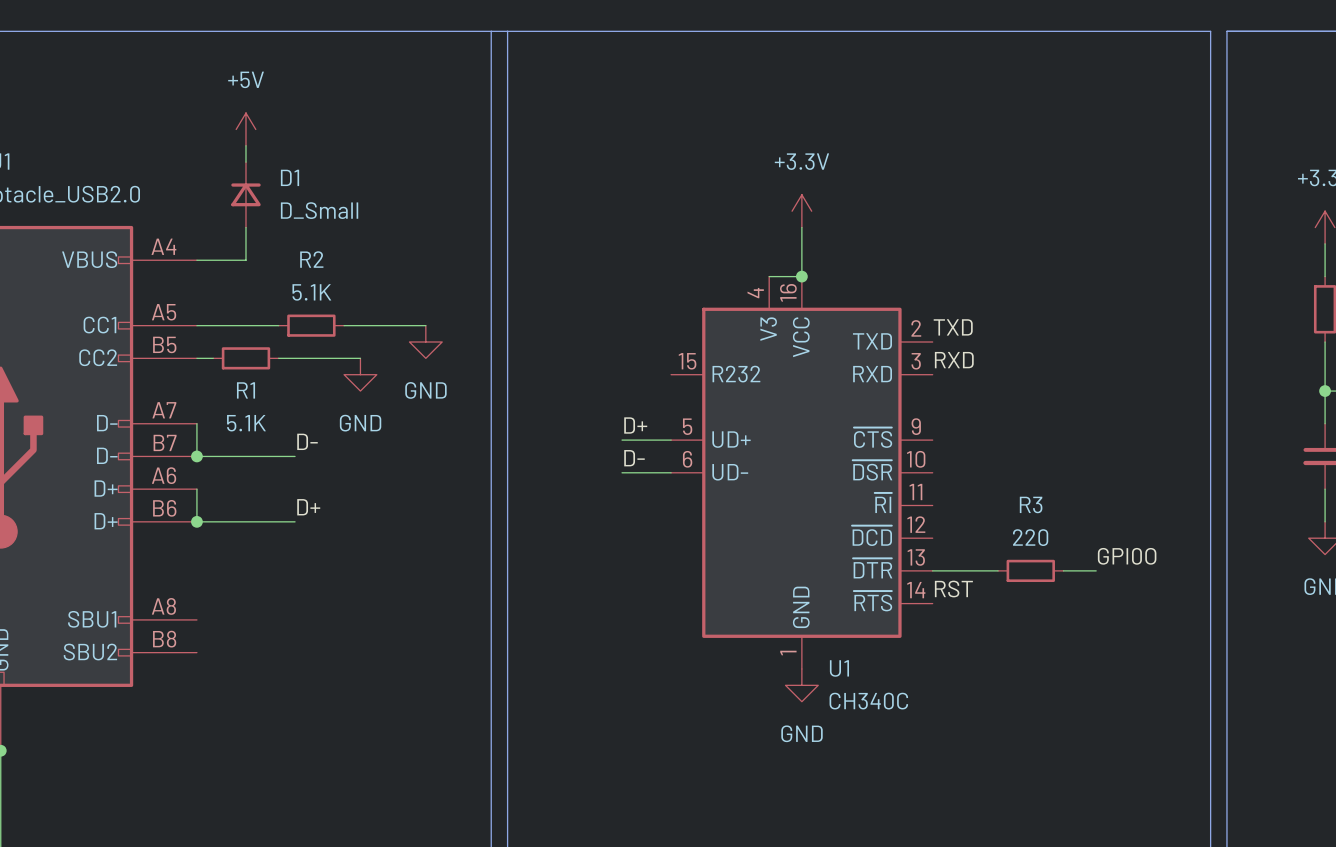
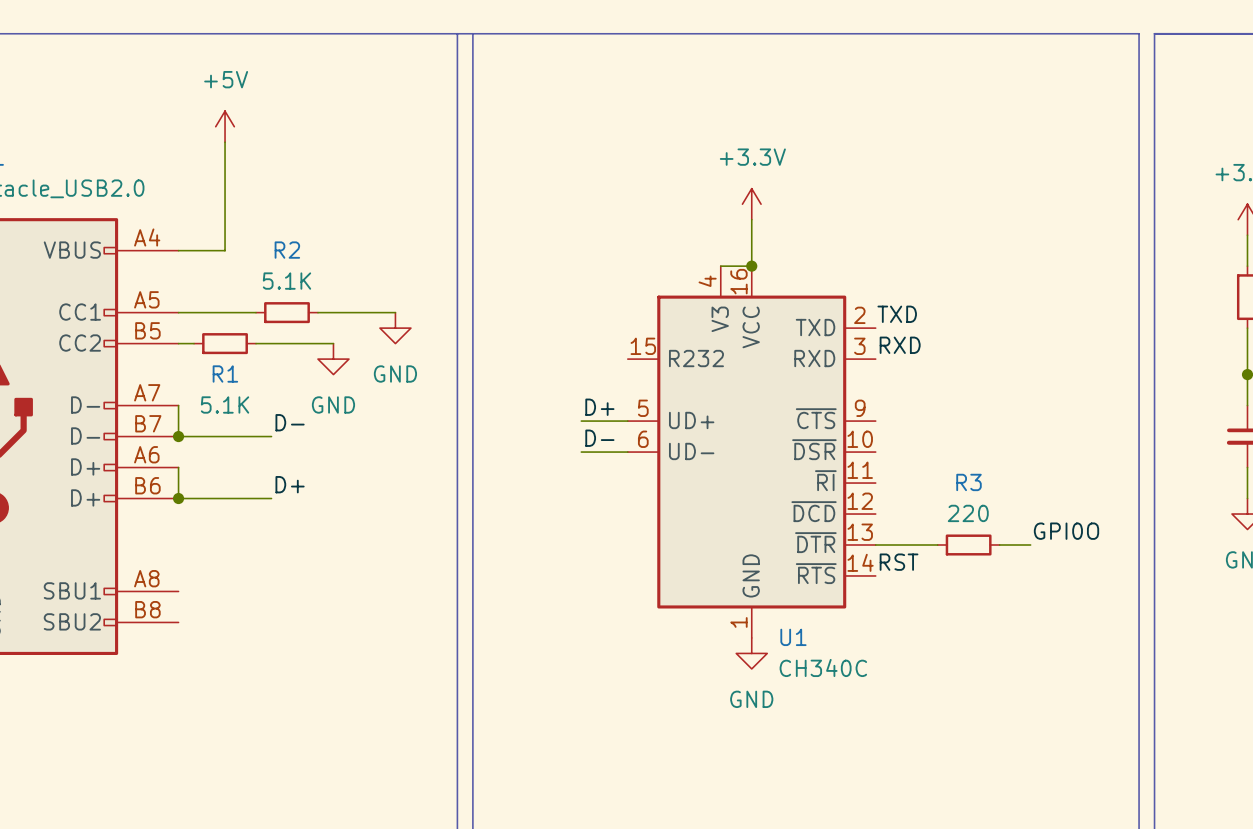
D1: D_Small (245, 194) -> none

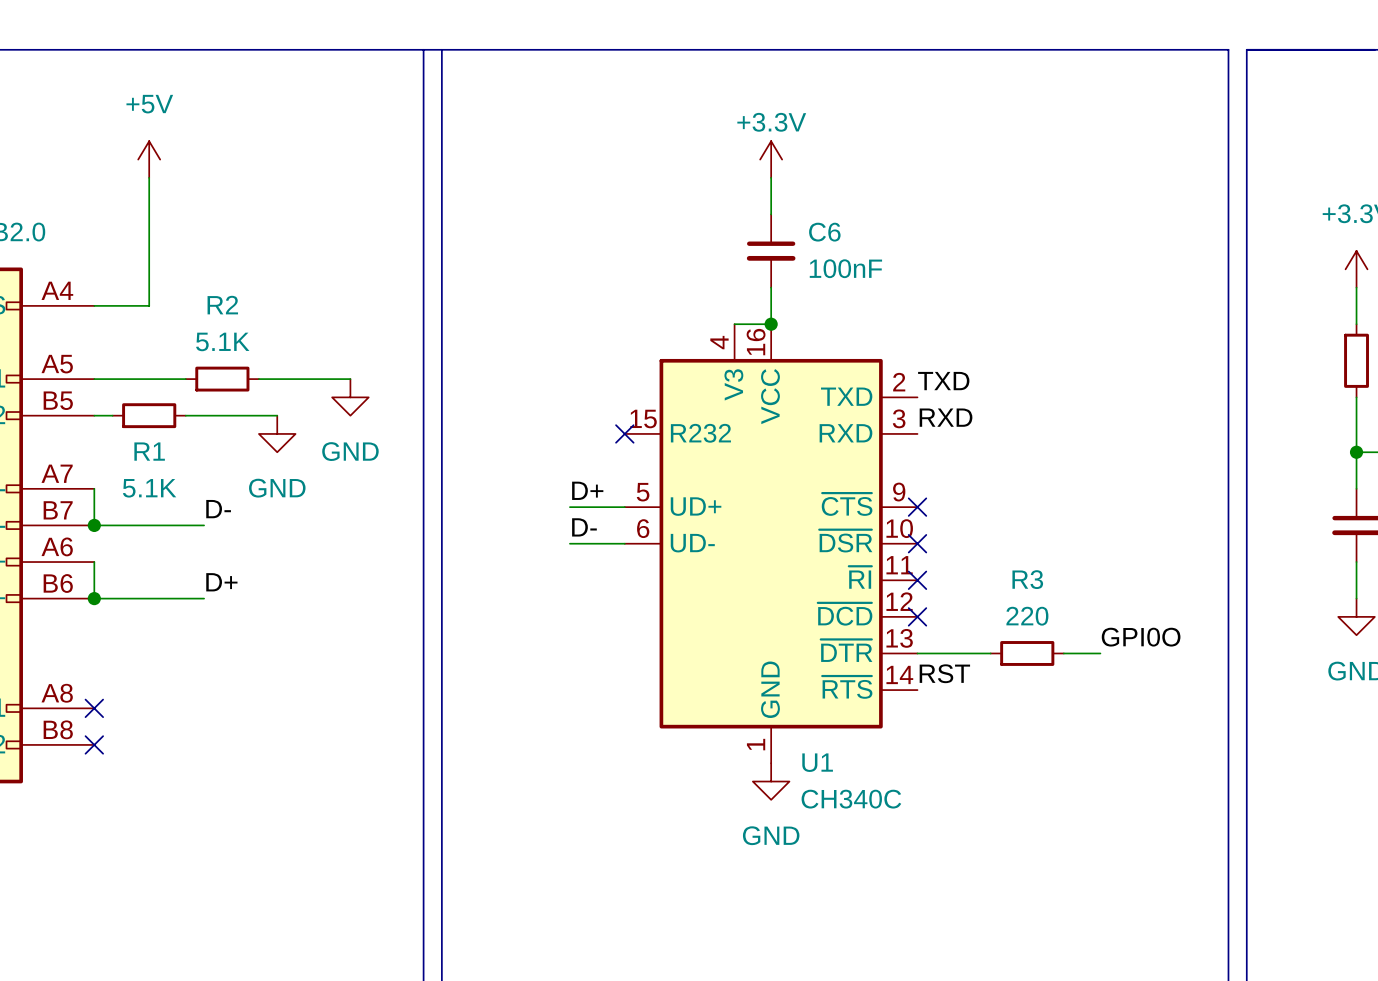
wire: none -> (771, 177) (771, 214)
power symbol text position: +3.3V (752, 157) -> +3.3V (771, 122)
power symbol position: +3.3V (751, 204) -> +3.3V (771, 159)
C6: none -> 100nF (771, 251)
no-connect mark: none -> (624, 433)
no-connect mark: none -> (917, 507)
no-connect mark: none -> (917, 543)
no-connect mark: none -> (917, 580)
no-connect mark: none -> (917, 616)
no-connect mark: none -> (94, 708)
no-connect mark: none -> (94, 744)

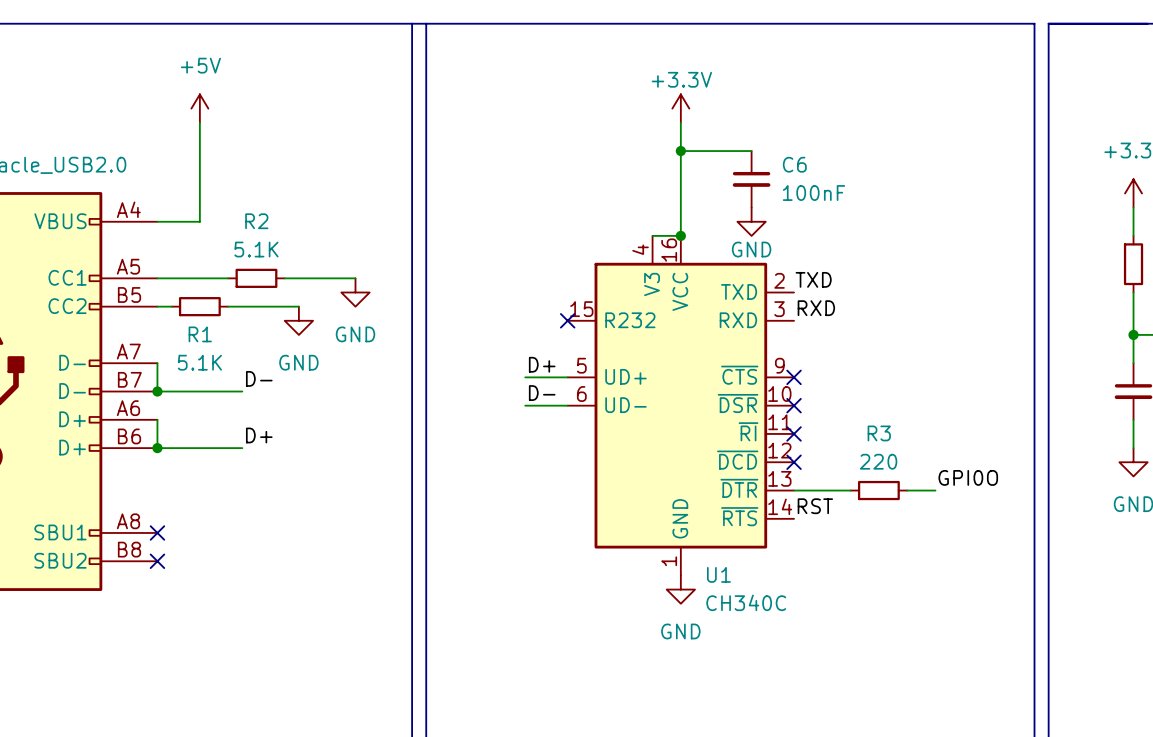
junction: none -> (680, 151)
wire: none -> (751, 151) (680, 151) (680, 207)
C6 position: (771, 251) -> (751, 179)
power symbol: none -> GND (751, 221)

